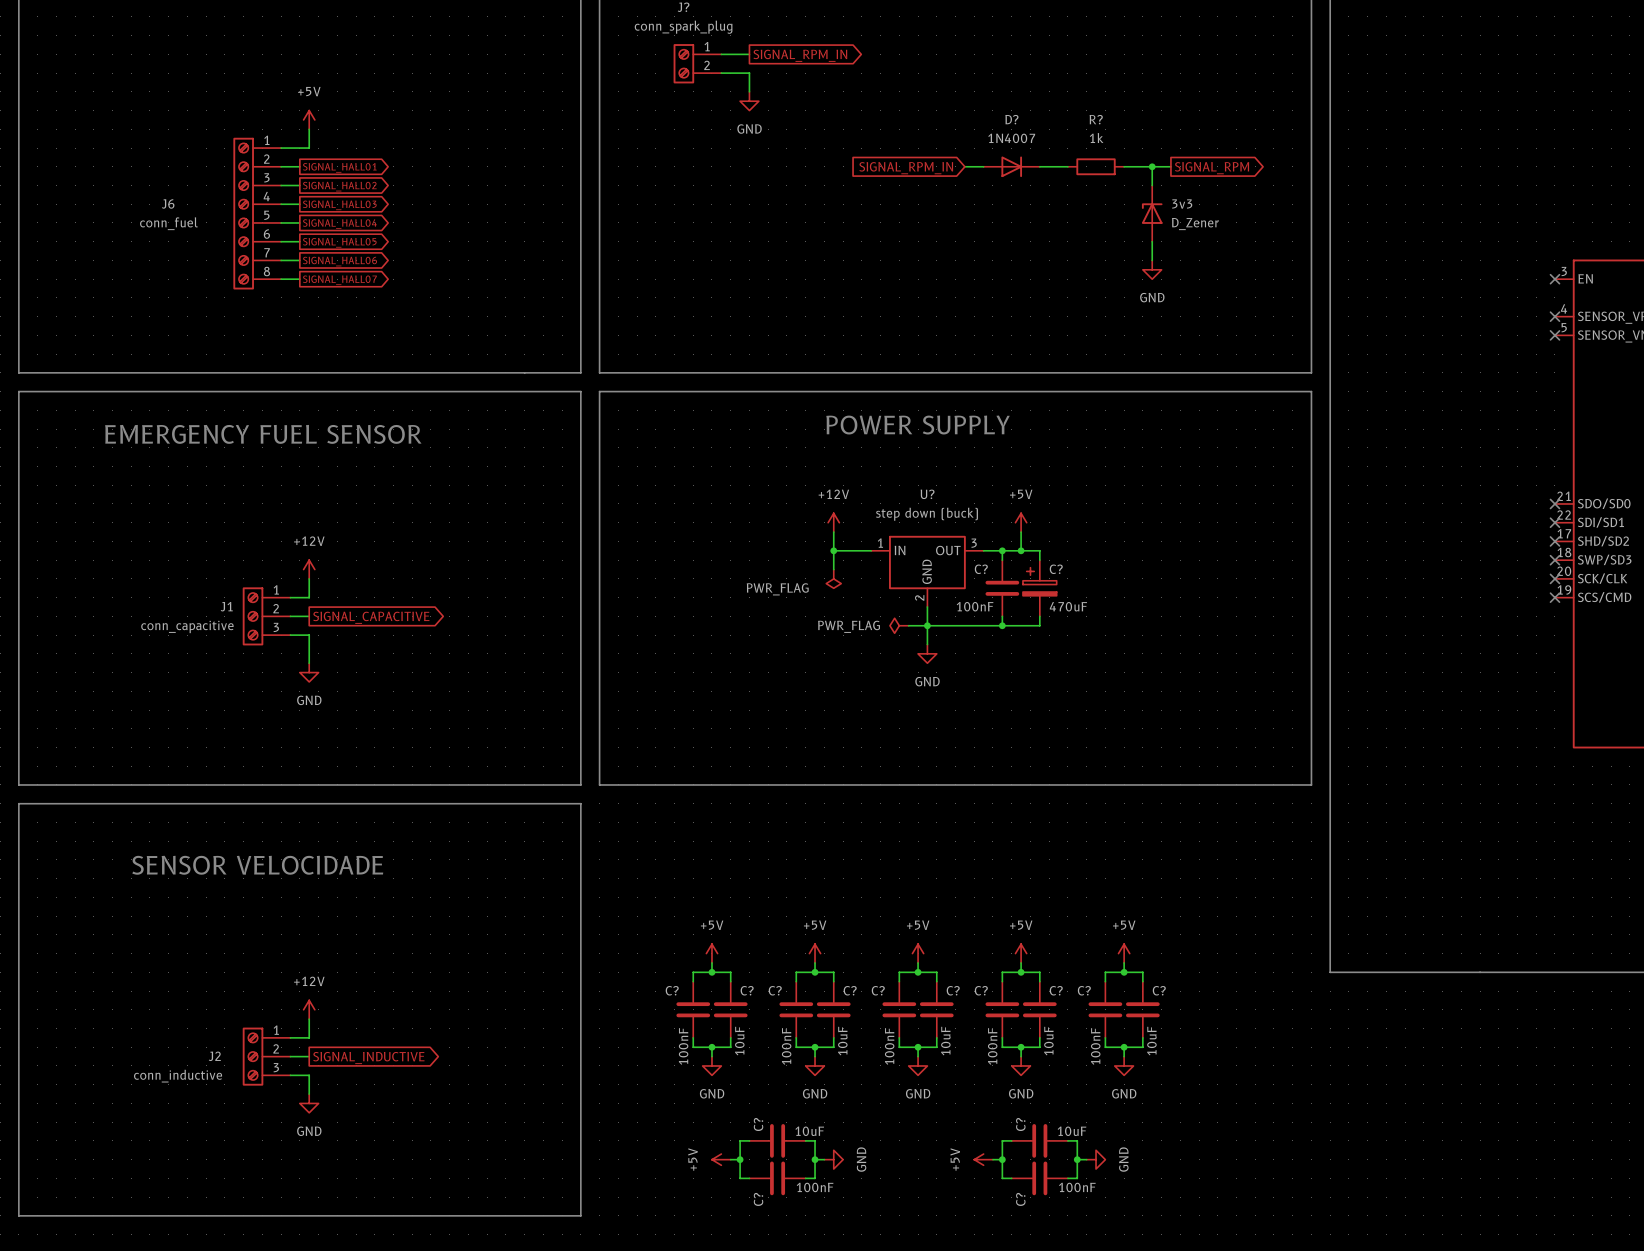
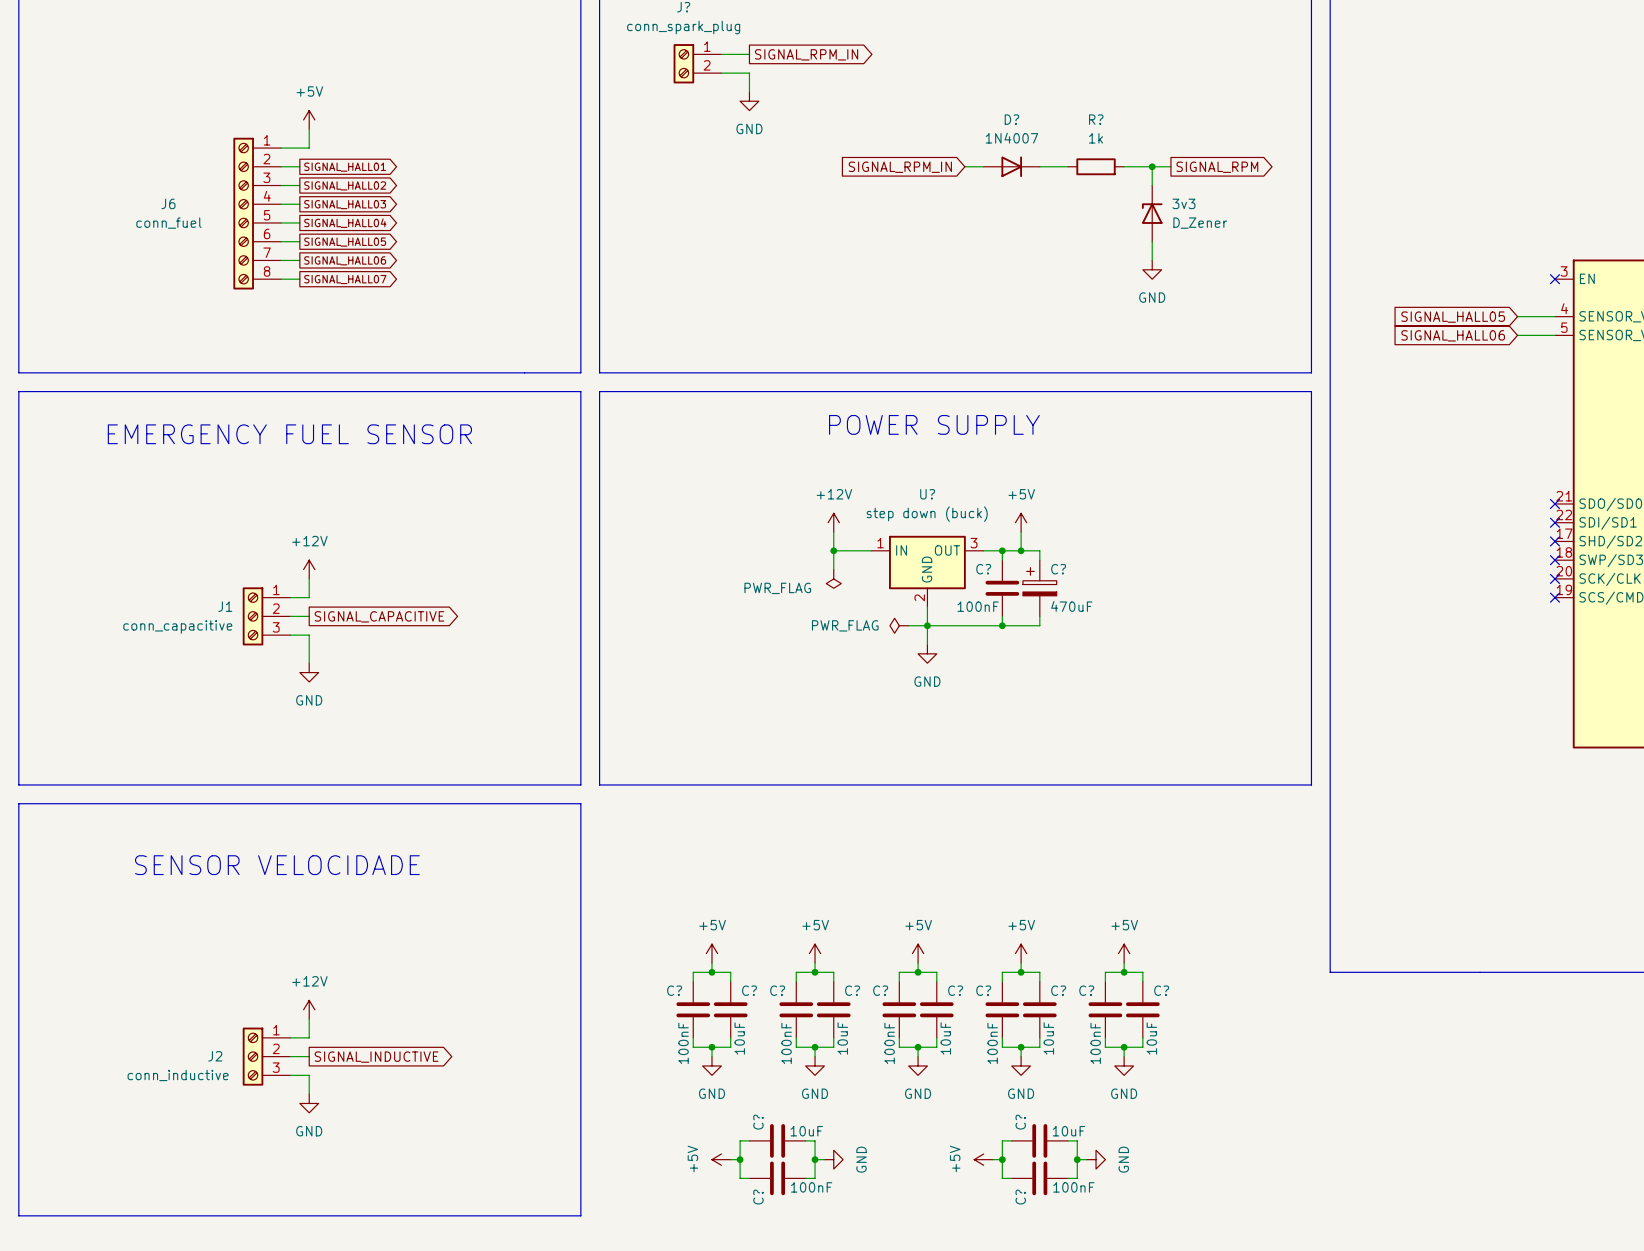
wire: none -> (1517, 316) (1554, 316)
no-connect mark: (1554, 316) -> none
global label: none -> SIGNAL_HALL05 (1453, 317)
wire: none -> (1517, 335) (1554, 335)
no-connect mark: (1554, 335) -> none
global label: none -> SIGNAL_HALL06 (1453, 335)

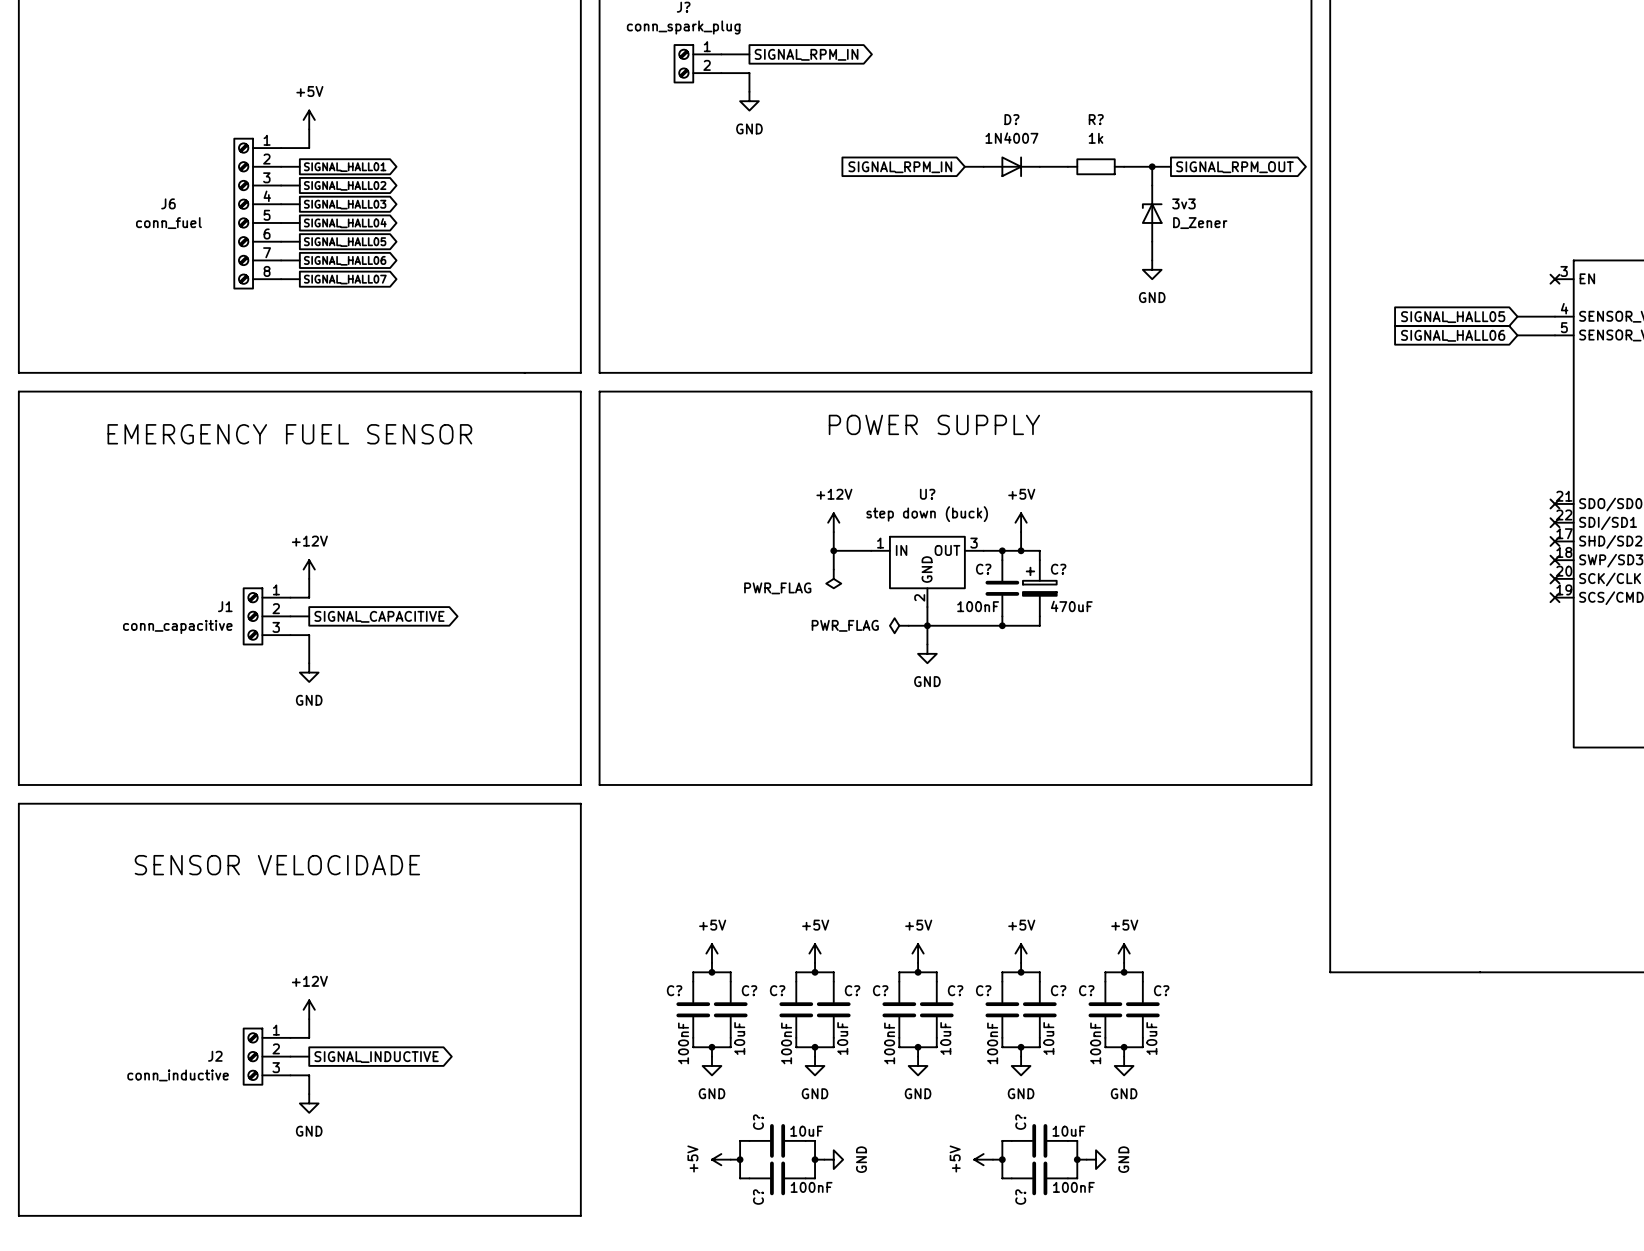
global label: SIGNAL_RPM (1217, 167) -> SIGNAL_RPM_OUT (1234, 167)

